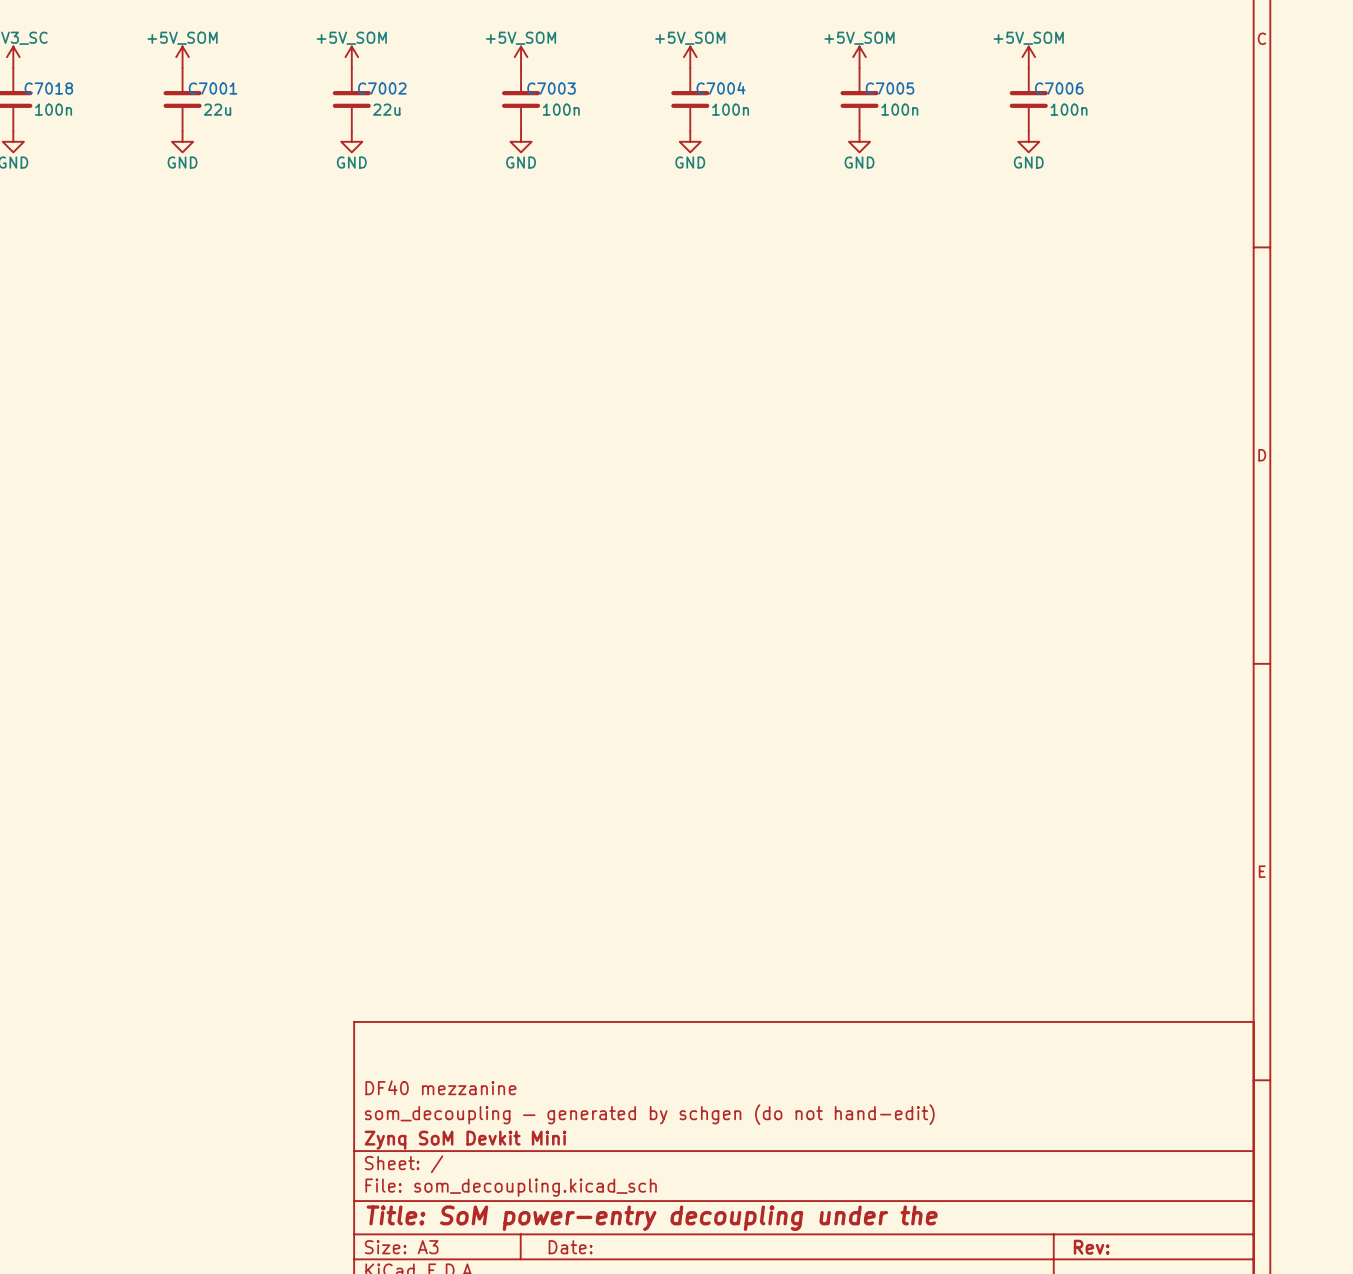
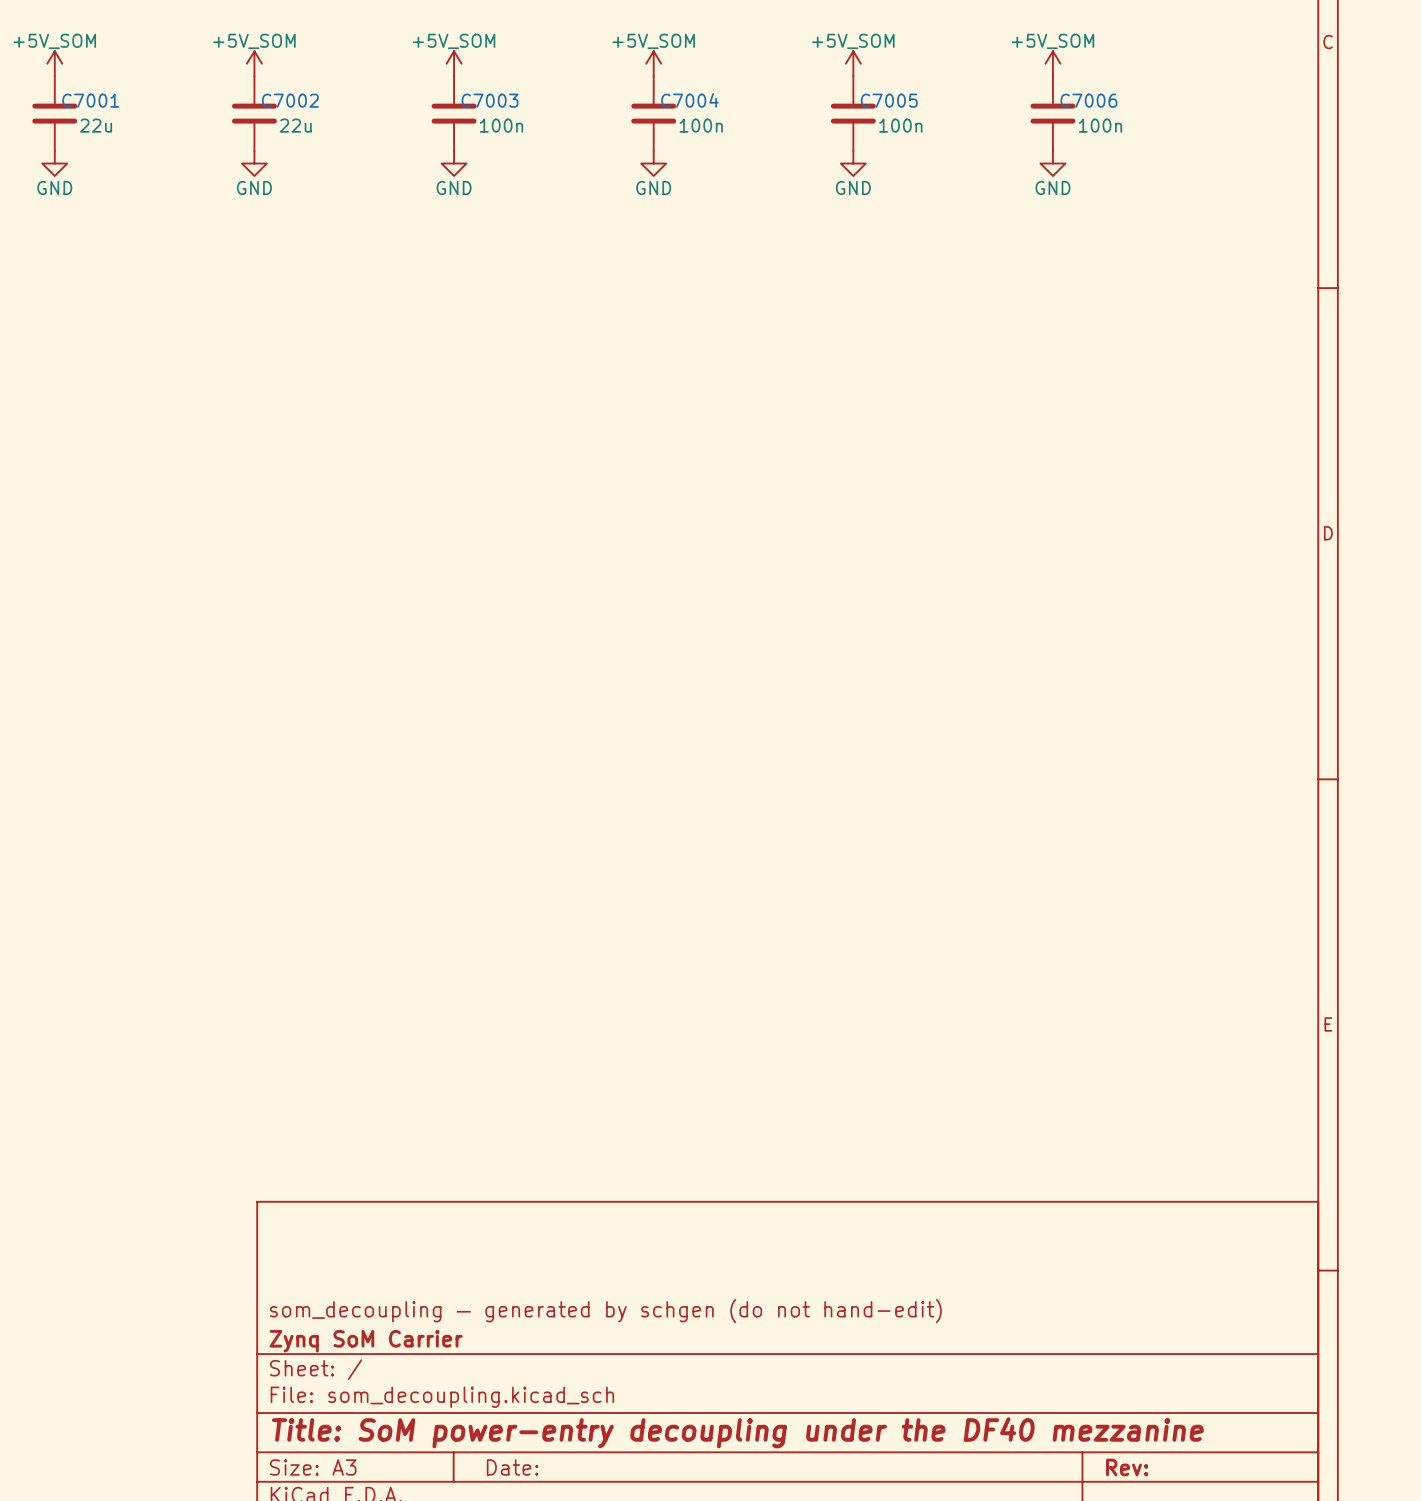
title block: DF40 mezzanine (440, 1087) -> none
title block: Zynq SoM Devkit Mini (465, 1140) -> Zynq SoM Carrier (366, 1341)
title block: Title: SoM power-entry decoupling under the (652, 1218) -> Title: SoM power-entry decoupling under the DF40 mezzanine (737, 1432)

